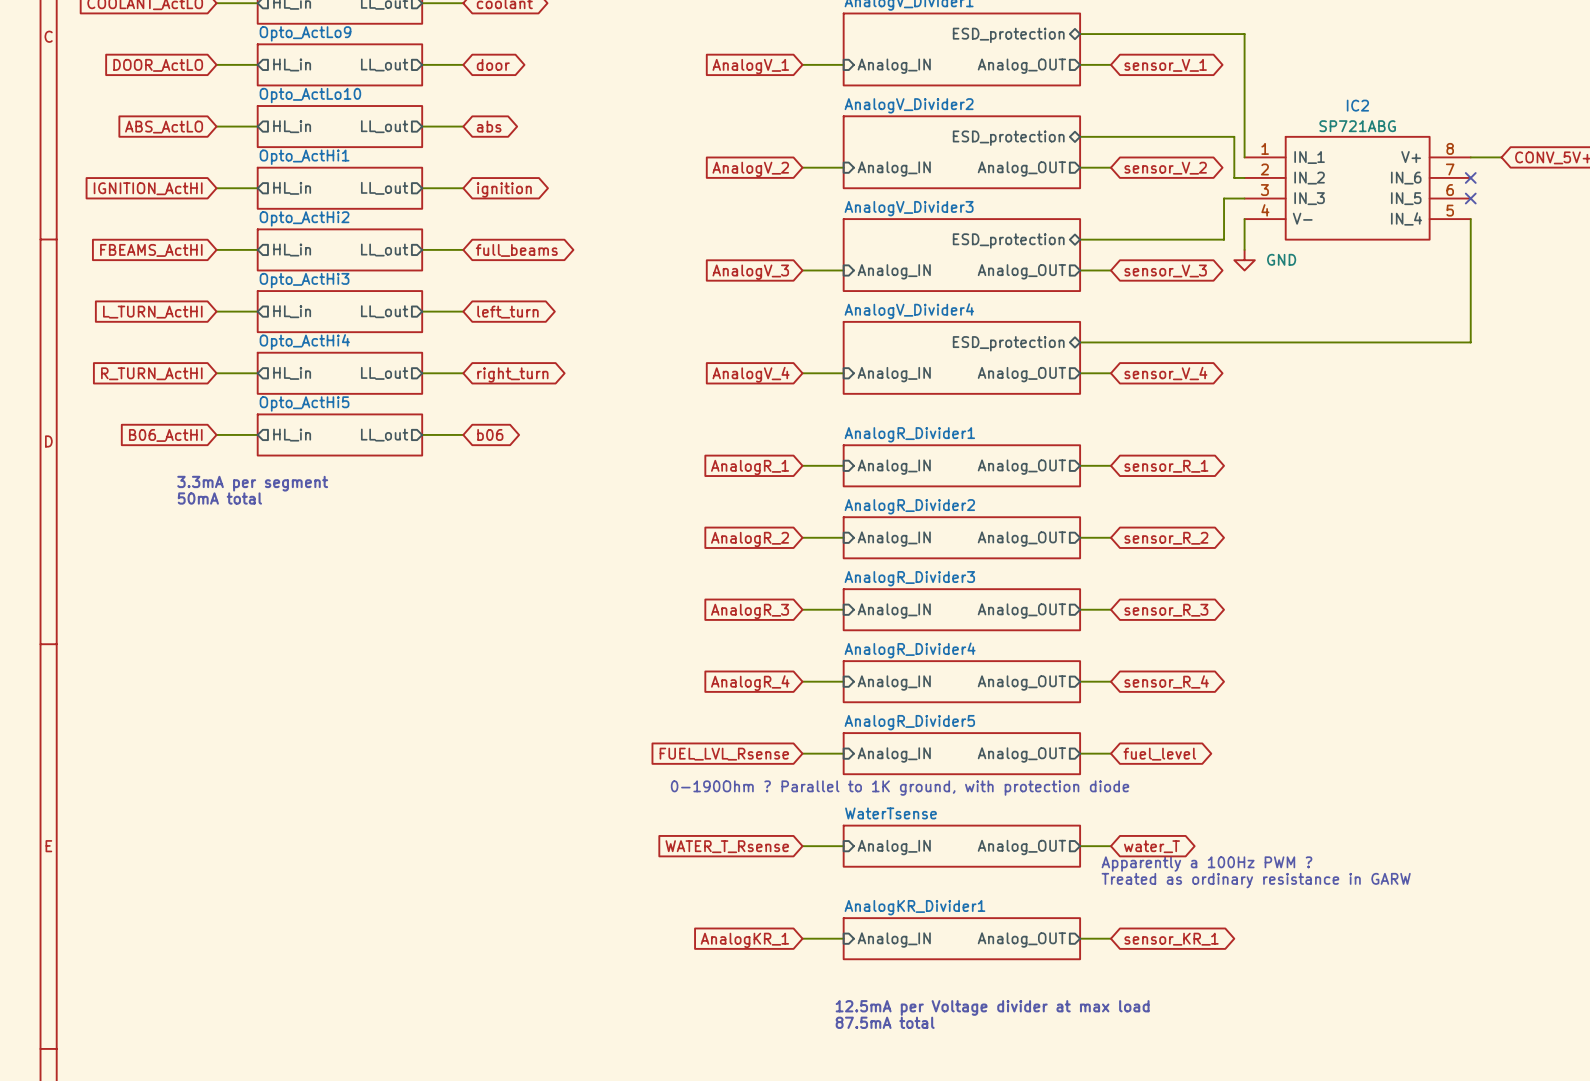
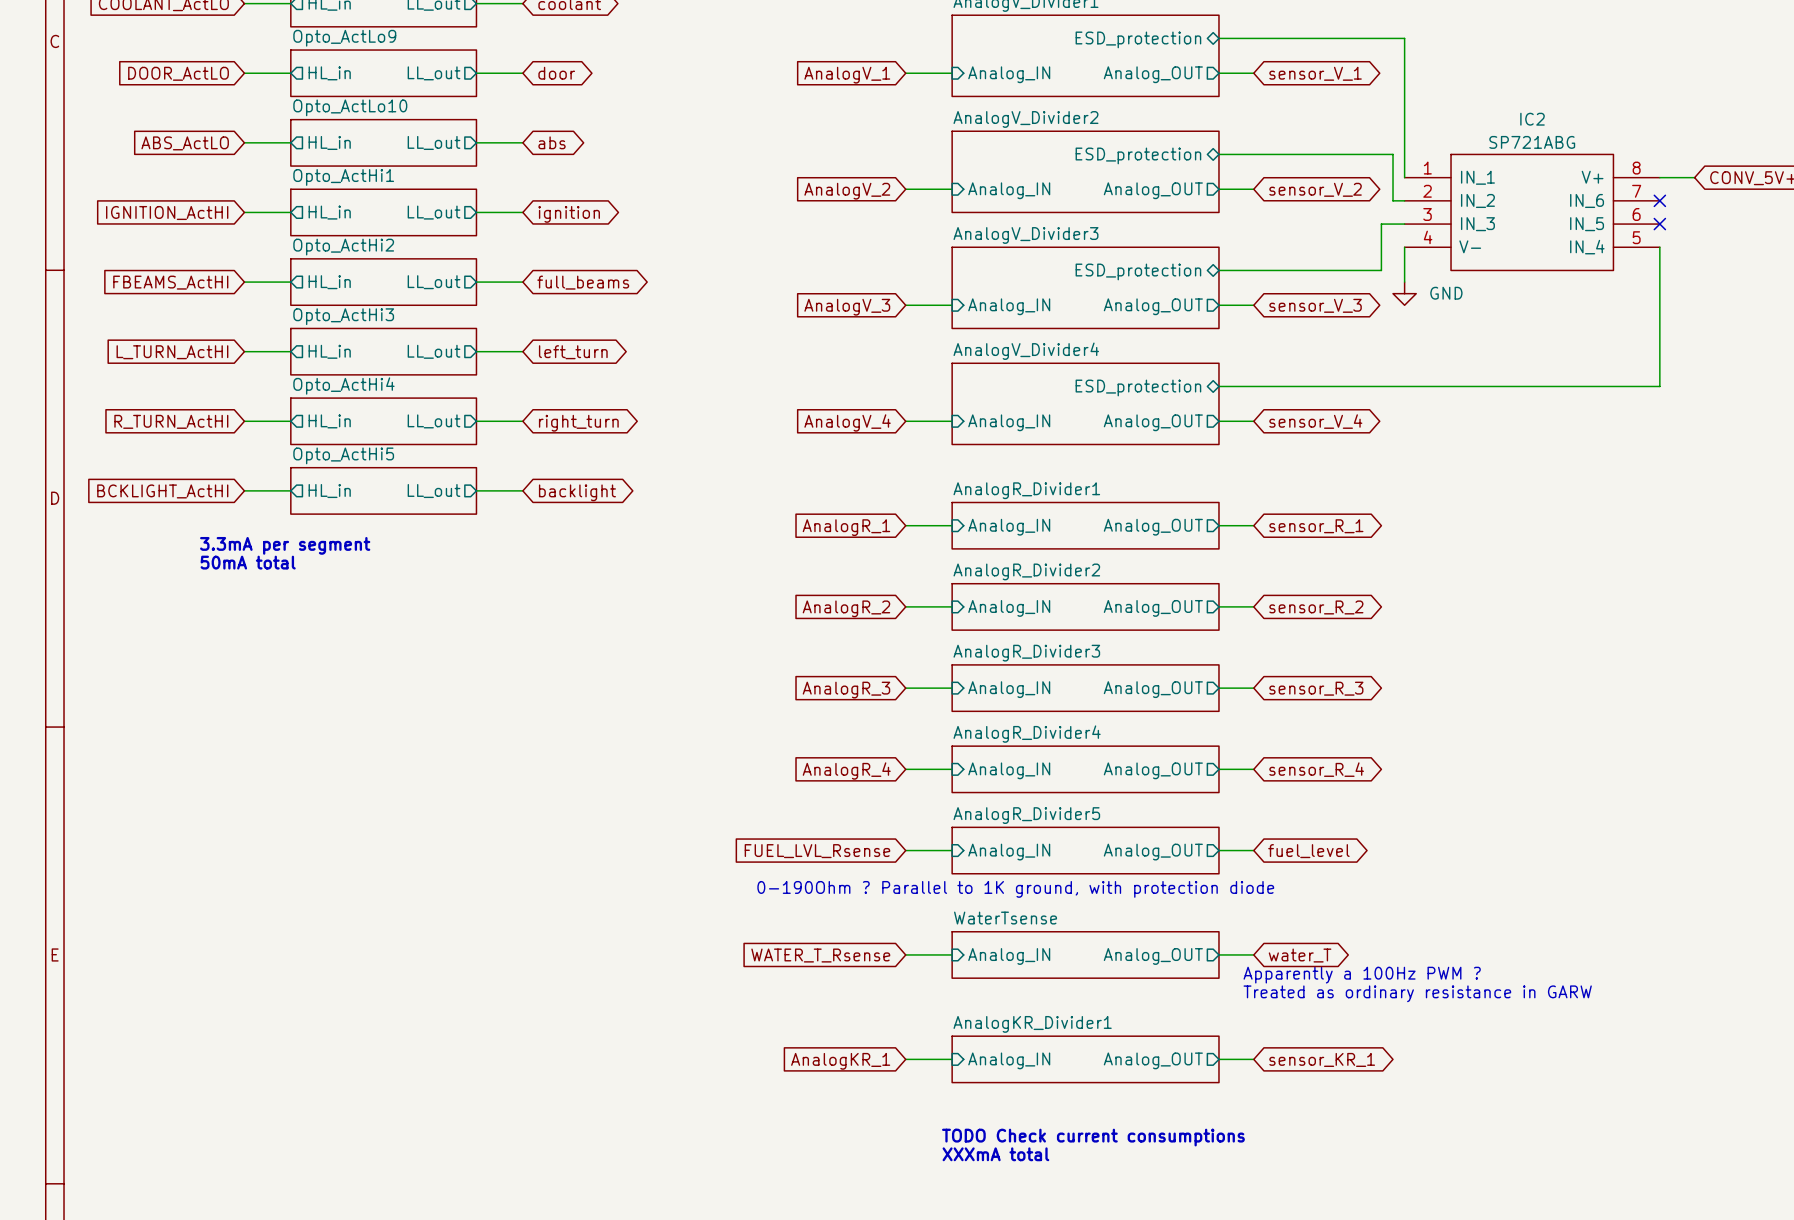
global label: b06 (490, 434) -> backlight (577, 492)
global label: B06_ActHI (165, 435) -> BCKLIGHT_ActHI (162, 491)
text: 12.5mA per Voltage divider at max load (992, 1007) -> TODO Check current consumptions (1093, 1137)
text: 87.5mA total (885, 1022) -> XXXmA total (995, 1154)

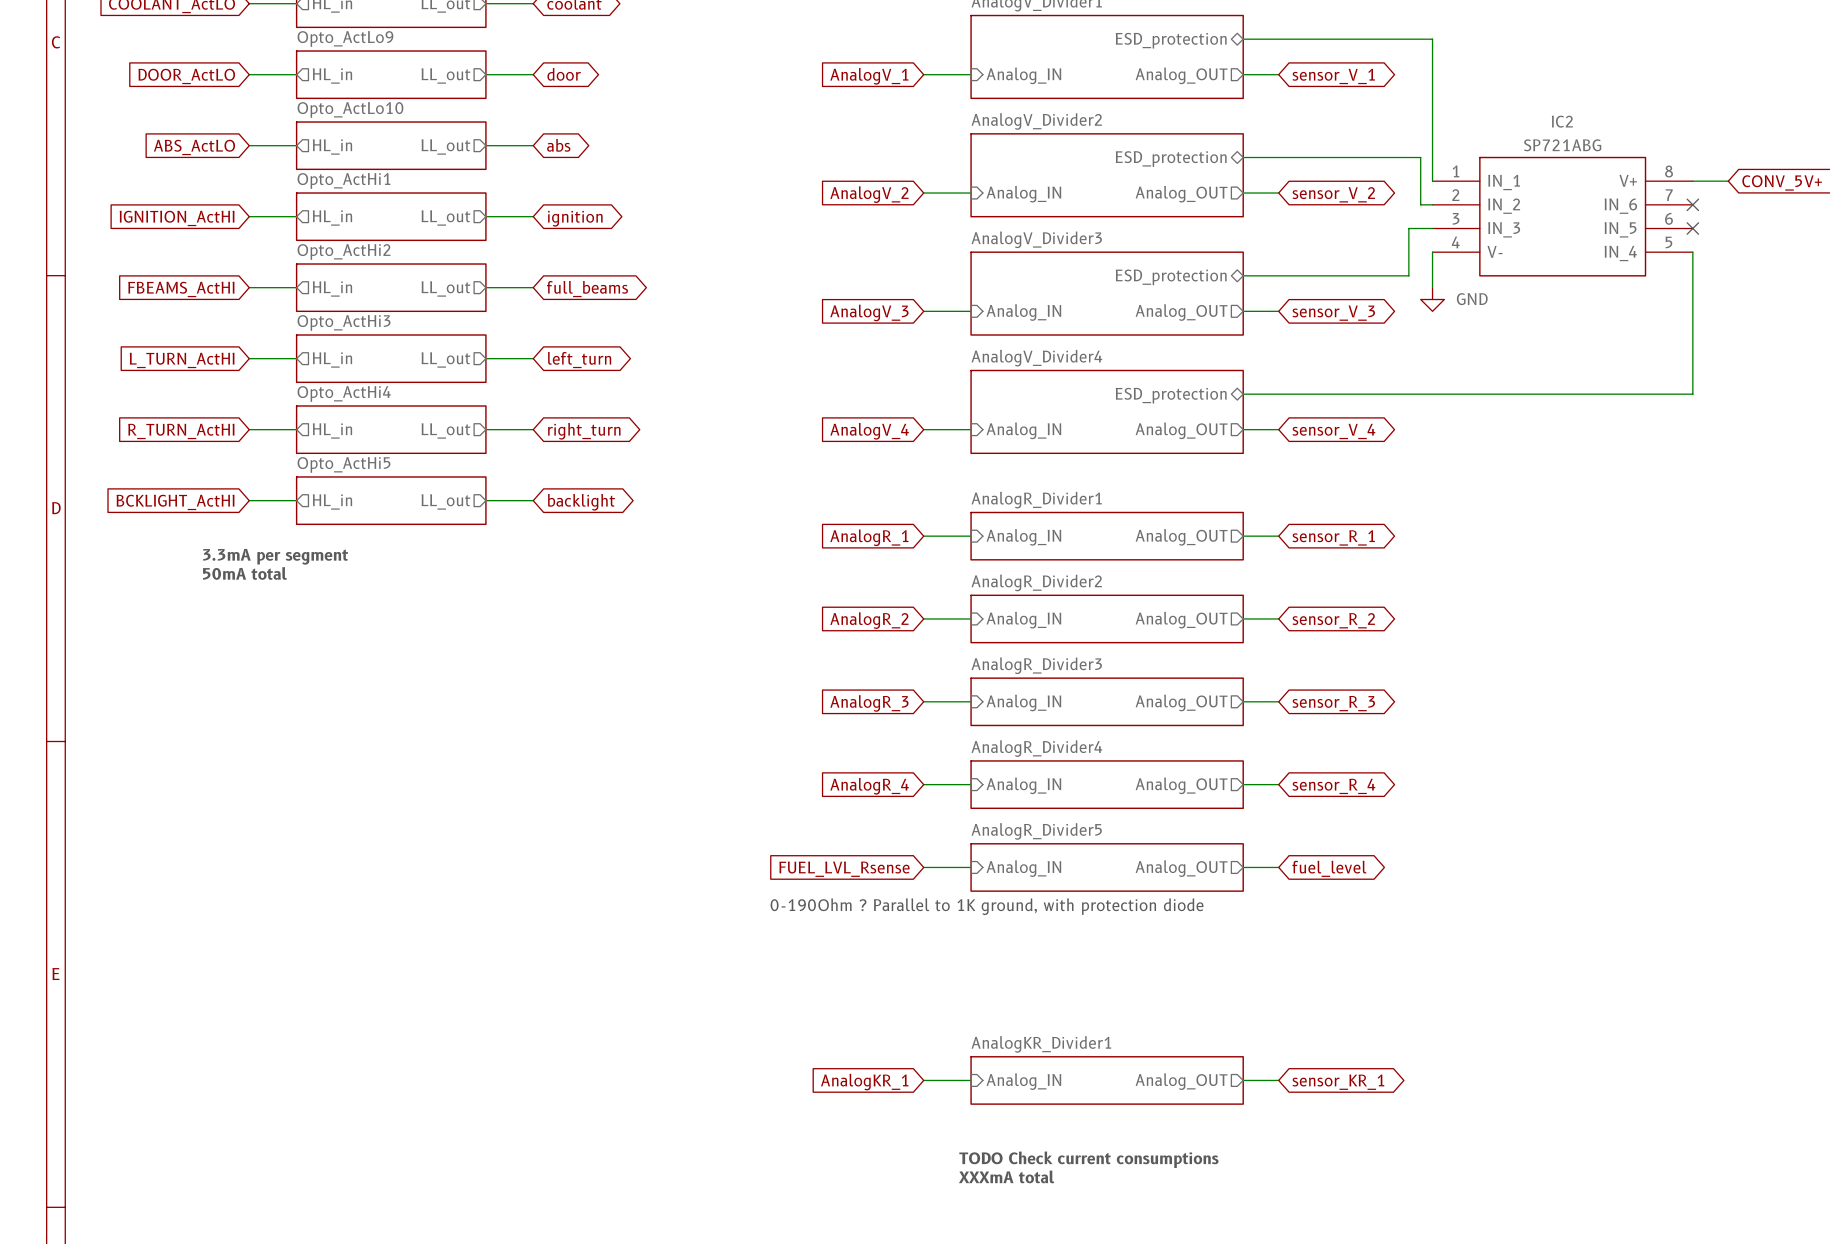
wire: (905, 954) (952, 954) -> none
sheet WaterTsense: (1085, 954) -> none
wire: (1218, 954) (1253, 954) -> none
global label: WATER_T_Rsense (820, 955) -> none
global label: water_T (1300, 955) -> none
sheet pin: Analog_IN (1009, 956) -> none
sheet pin: Analog_OUT (1153, 956) -> none
text: Apparently a 100Hz PWM ? (1362, 975) -> none
text: Treated as ordinary resistance in GARW (1417, 993) -> none

